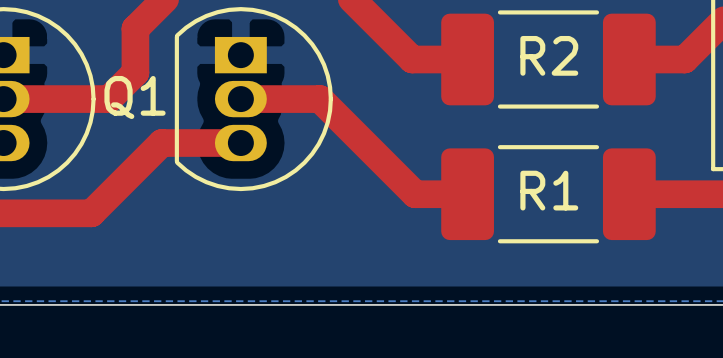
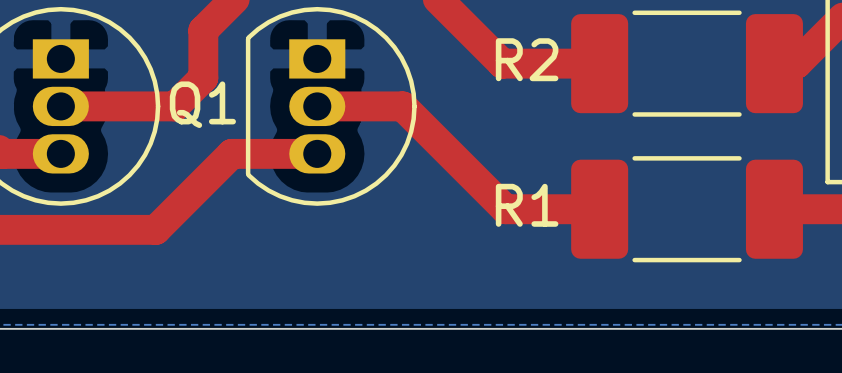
R2 name position: R2 (549, 55) -> R2 (527, 59)
R2 position: (548, 59) -> (687, 63)
R1 name position: R1 (549, 190) -> R1 (527, 205)
R1 position: (548, 194) -> (687, 209)

